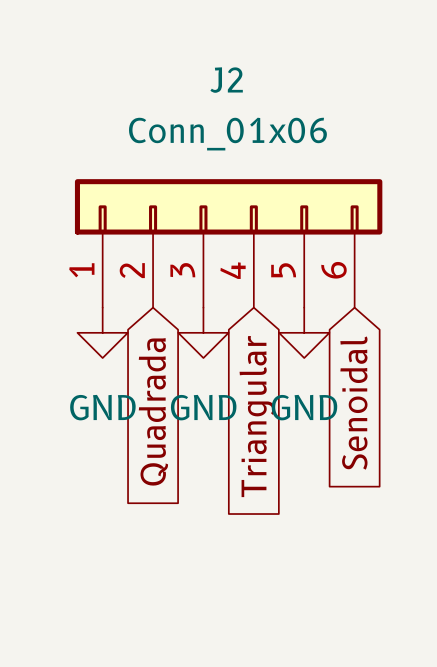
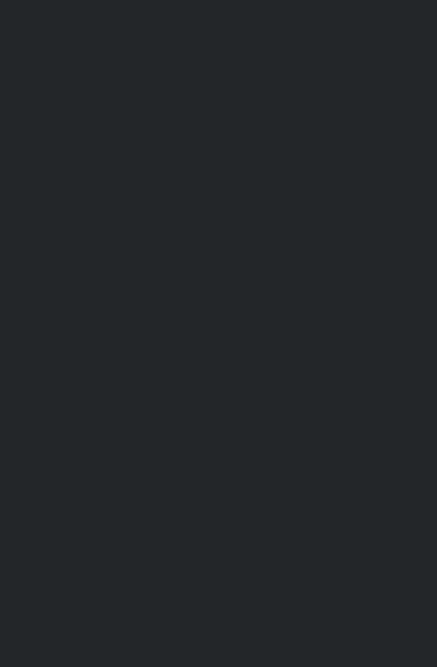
J2: Conn_01x06 (228, 243) -> none
power symbol: GND (102, 332) -> none
power symbol: GND (203, 332) -> none
power symbol: GND (304, 332) -> none
global label: Senoidal (353, 403) -> none
global label: Quadrada (153, 411) -> none
global label: Triangular (257, 416) -> none

